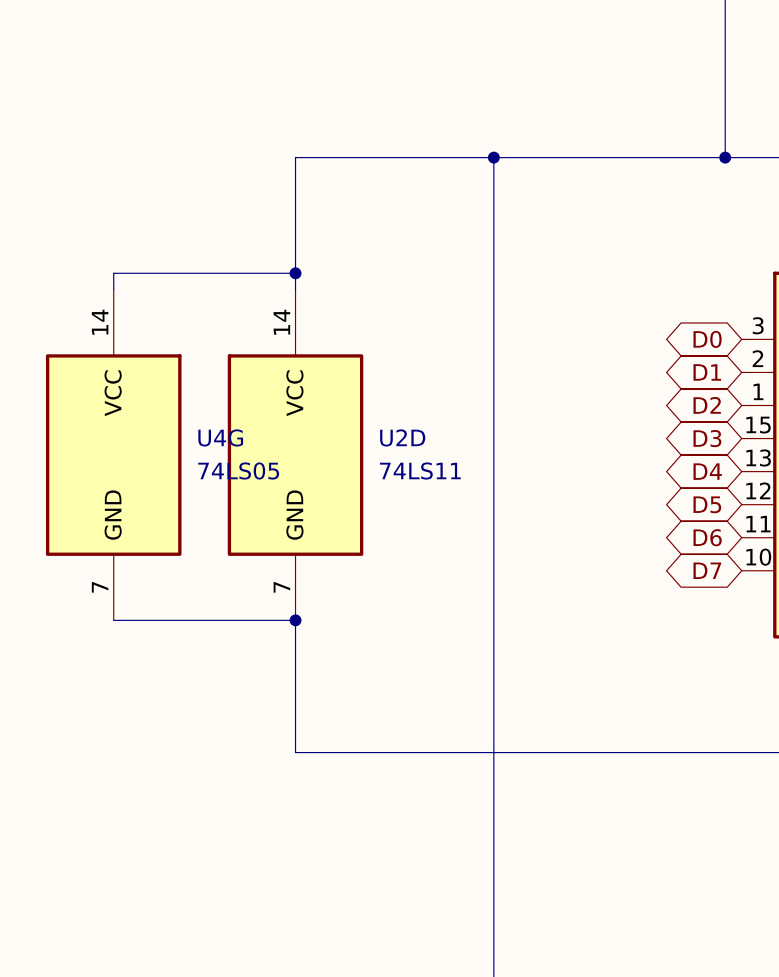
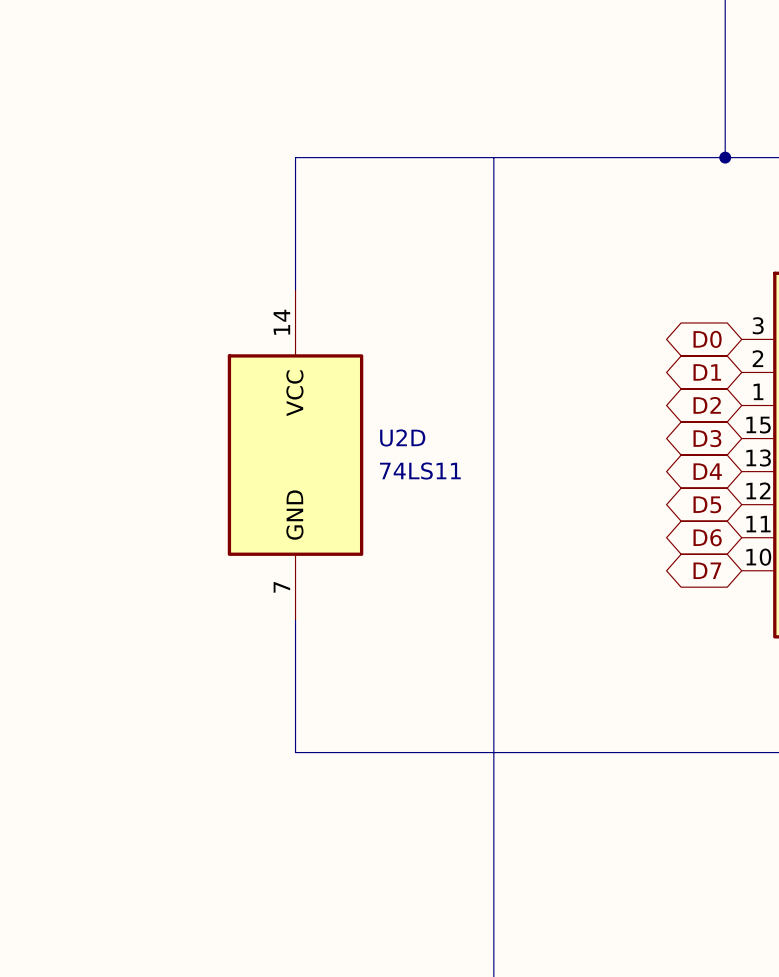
junction: (493, 157) -> none
wire: (295, 273) (113, 273) (113, 289) -> none
junction: (295, 273) -> none
U4G: 74LS05 (113, 455) -> none
wire: (113, 620) (295, 620) -> none
junction: (295, 620) -> none

